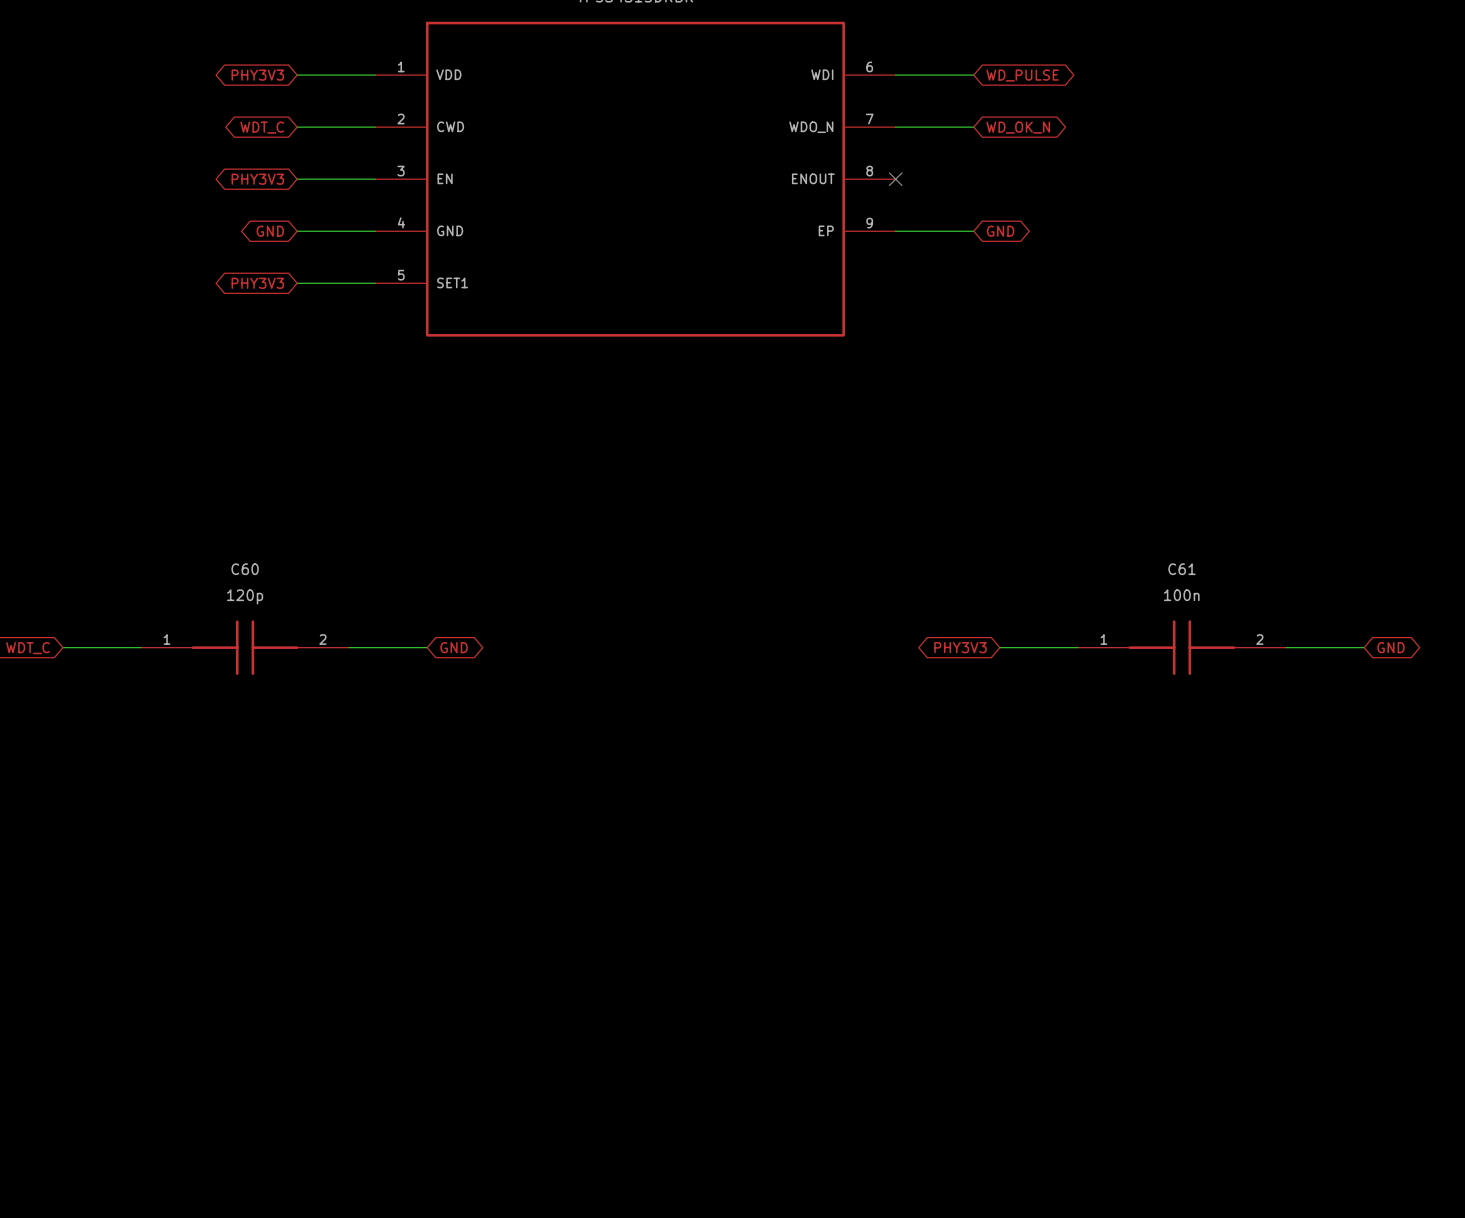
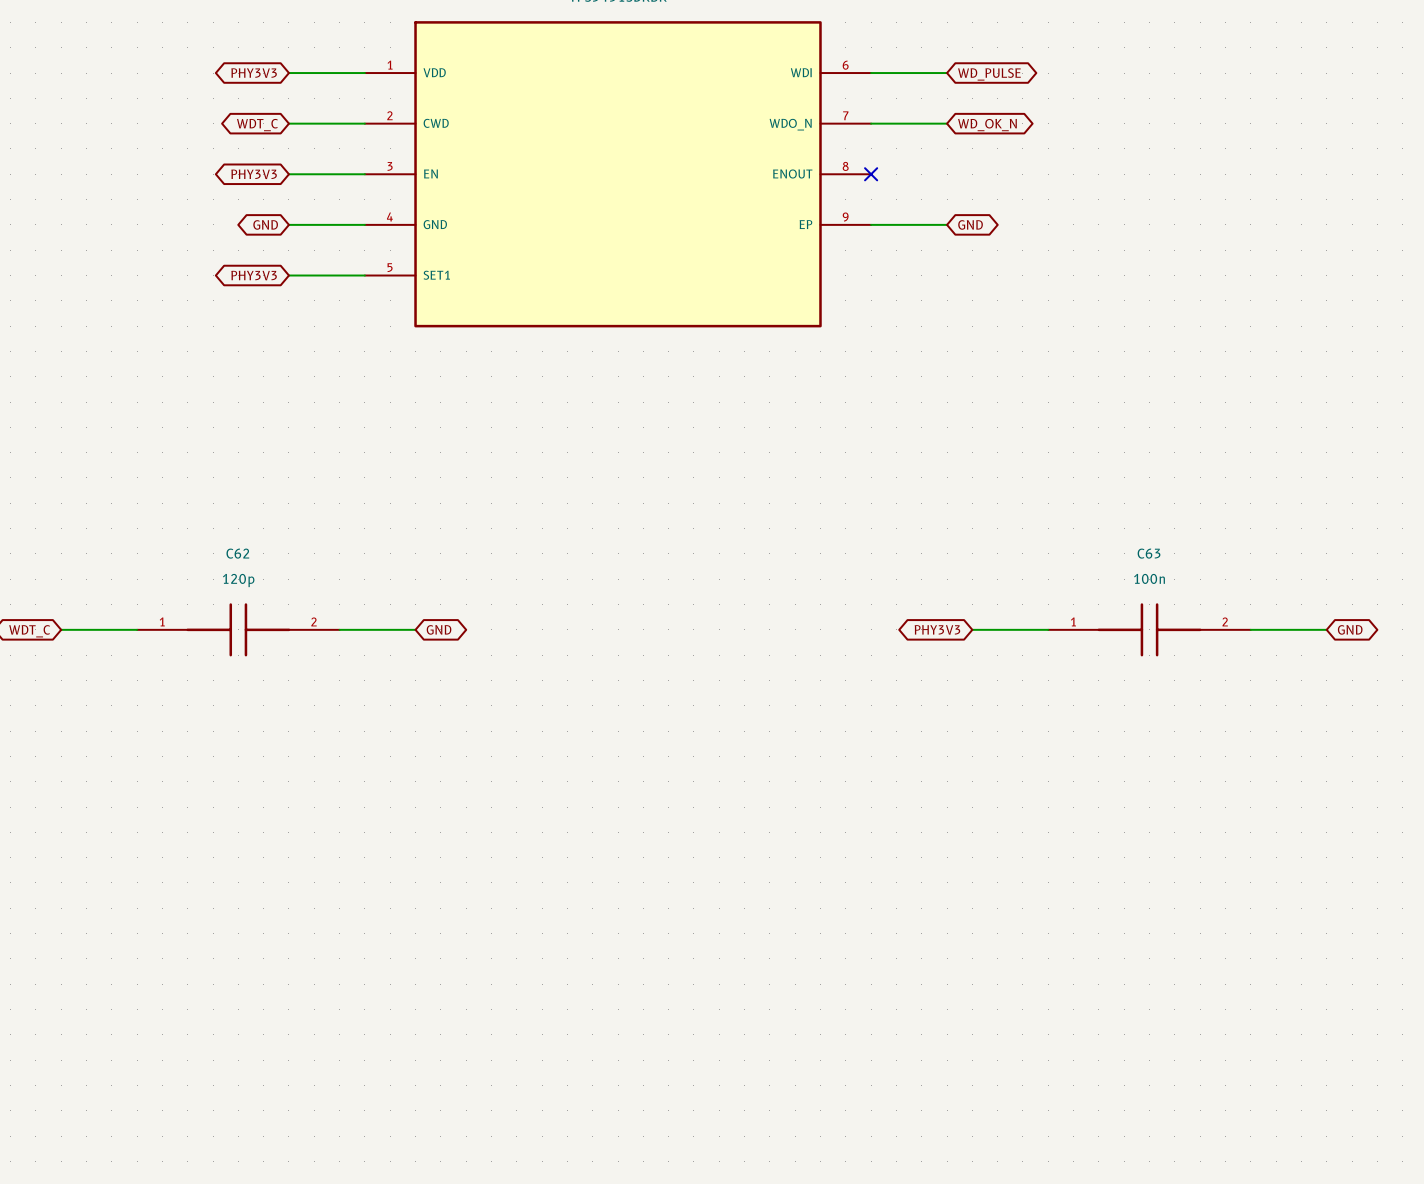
C60 name: C60 (245, 569) -> C62 (237, 553)
C61 name: C61 (1182, 569) -> C63 (1149, 553)

